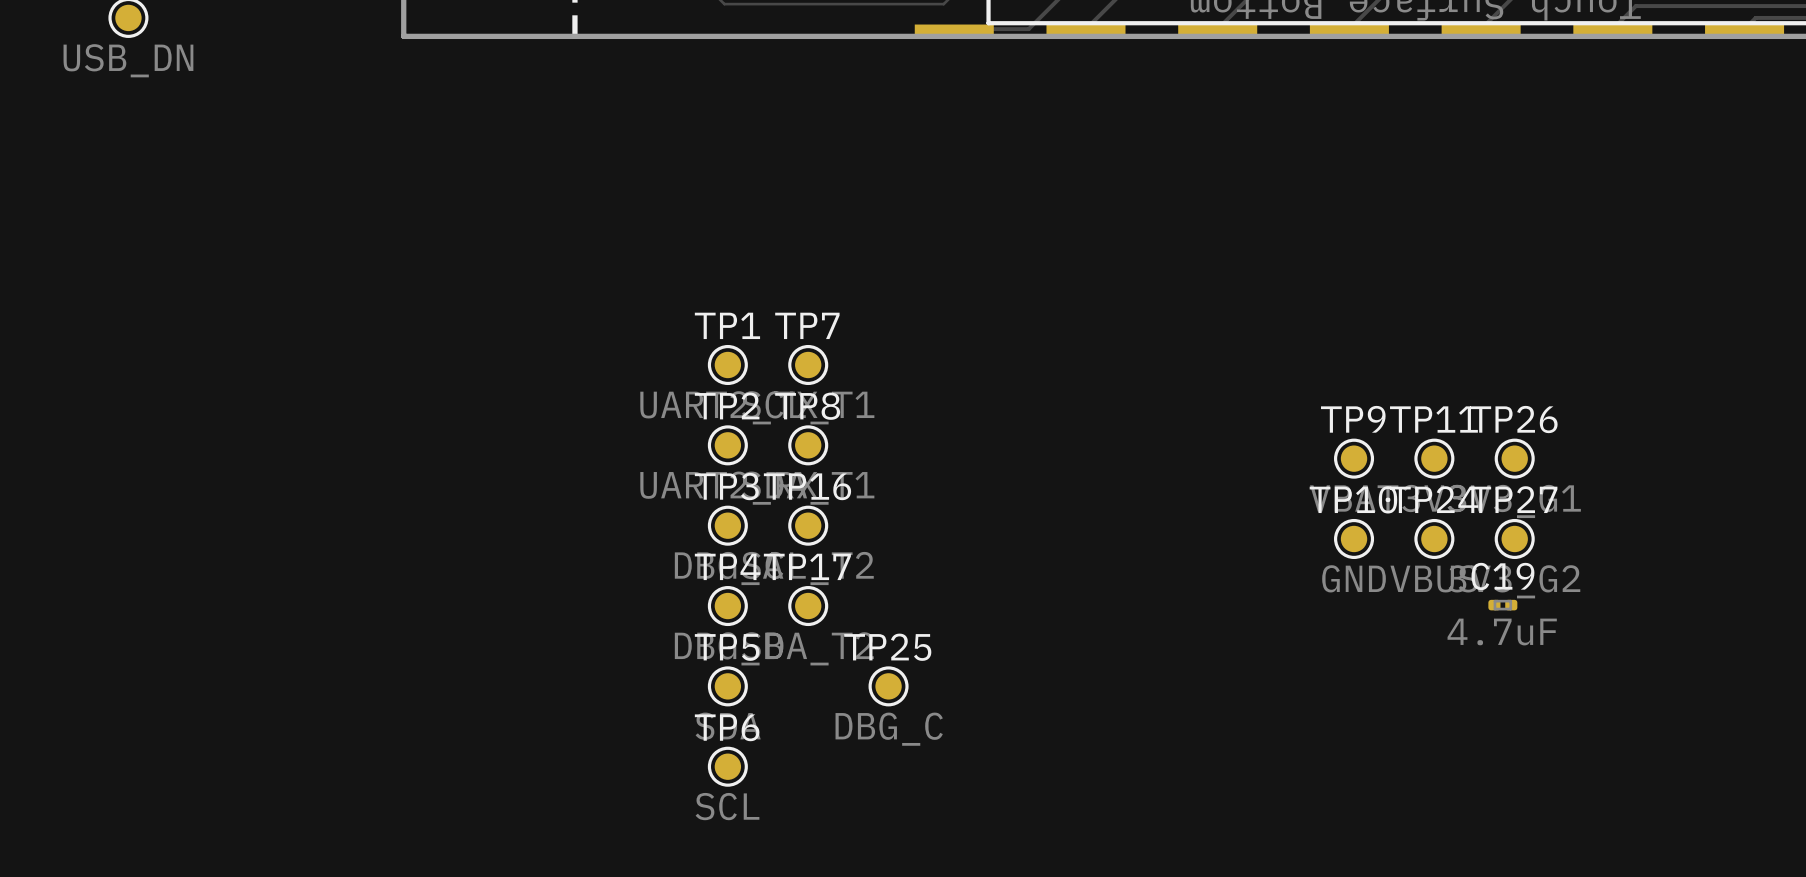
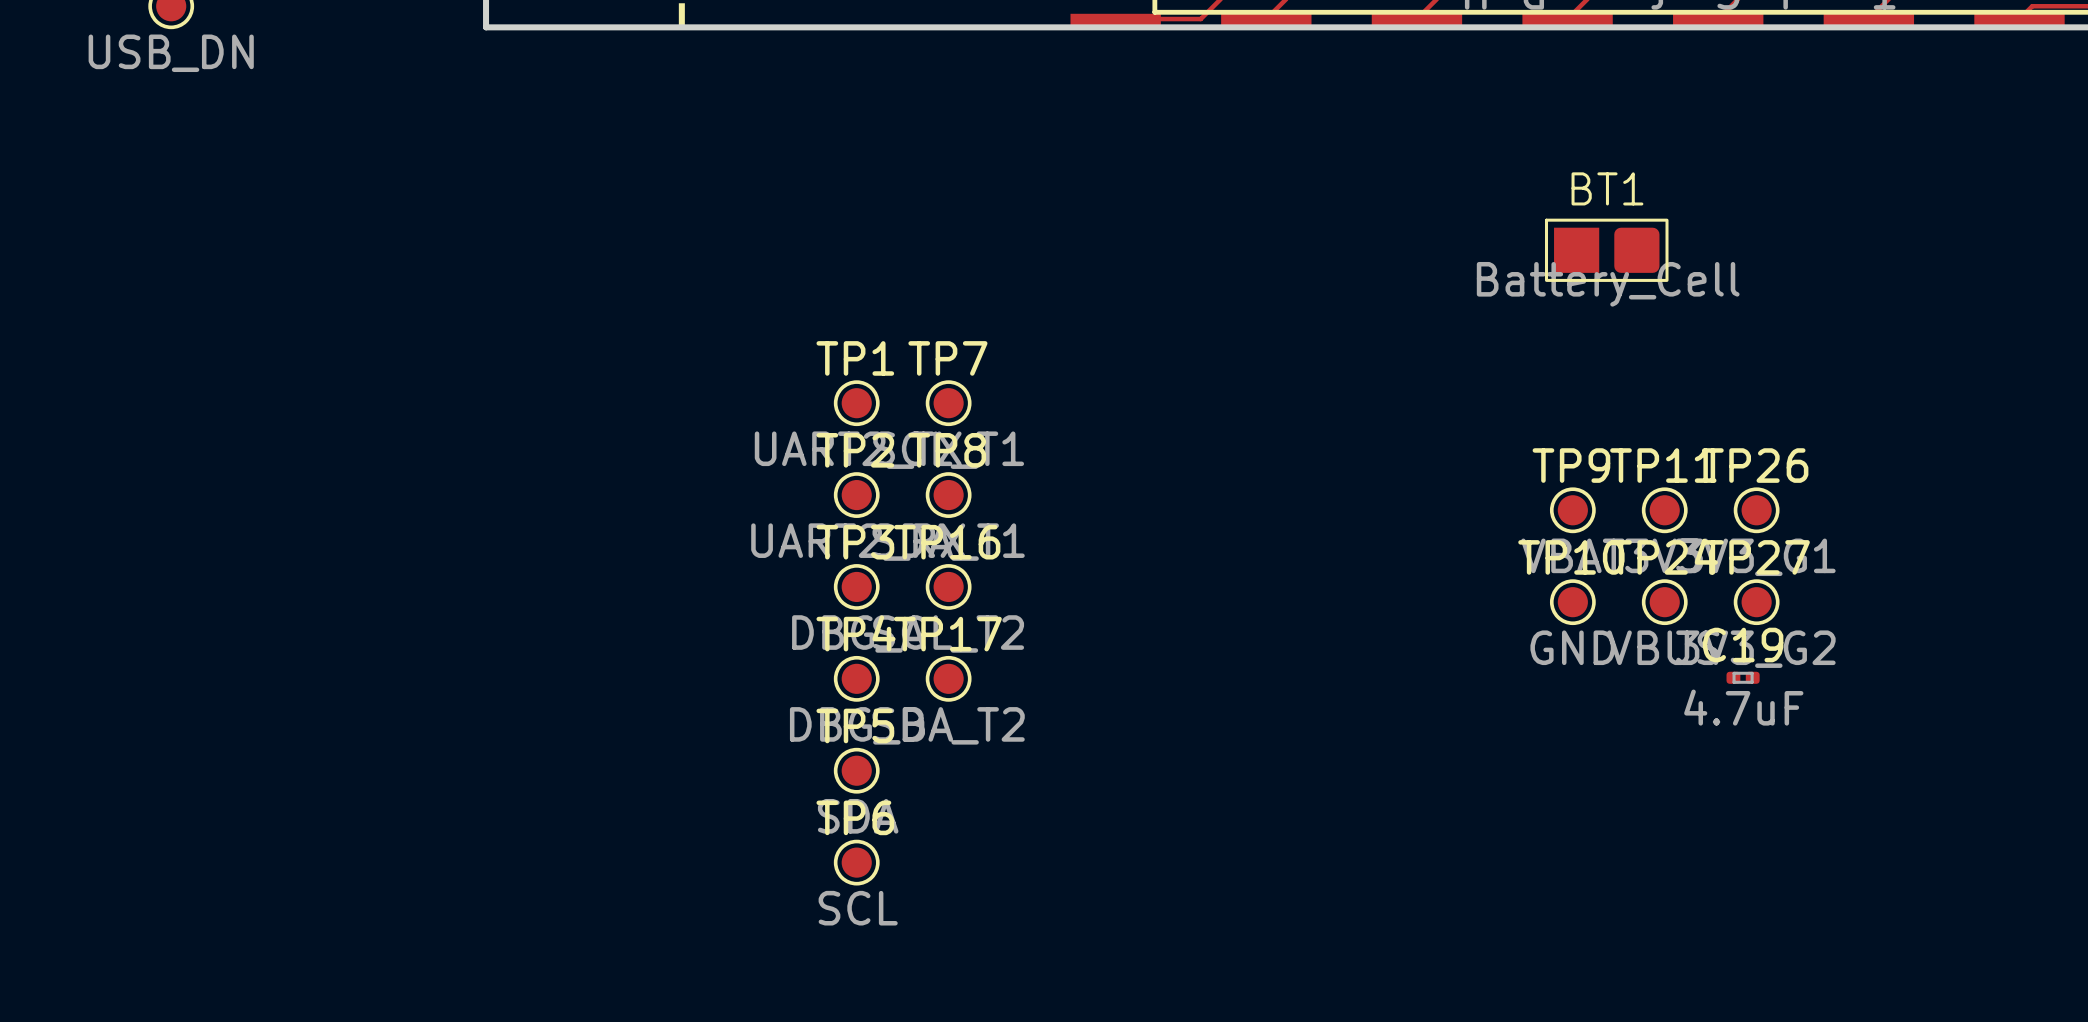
BT1: none -> Battery_Cell (1606, 250)
TP25: DBG_C (888, 686) -> none

